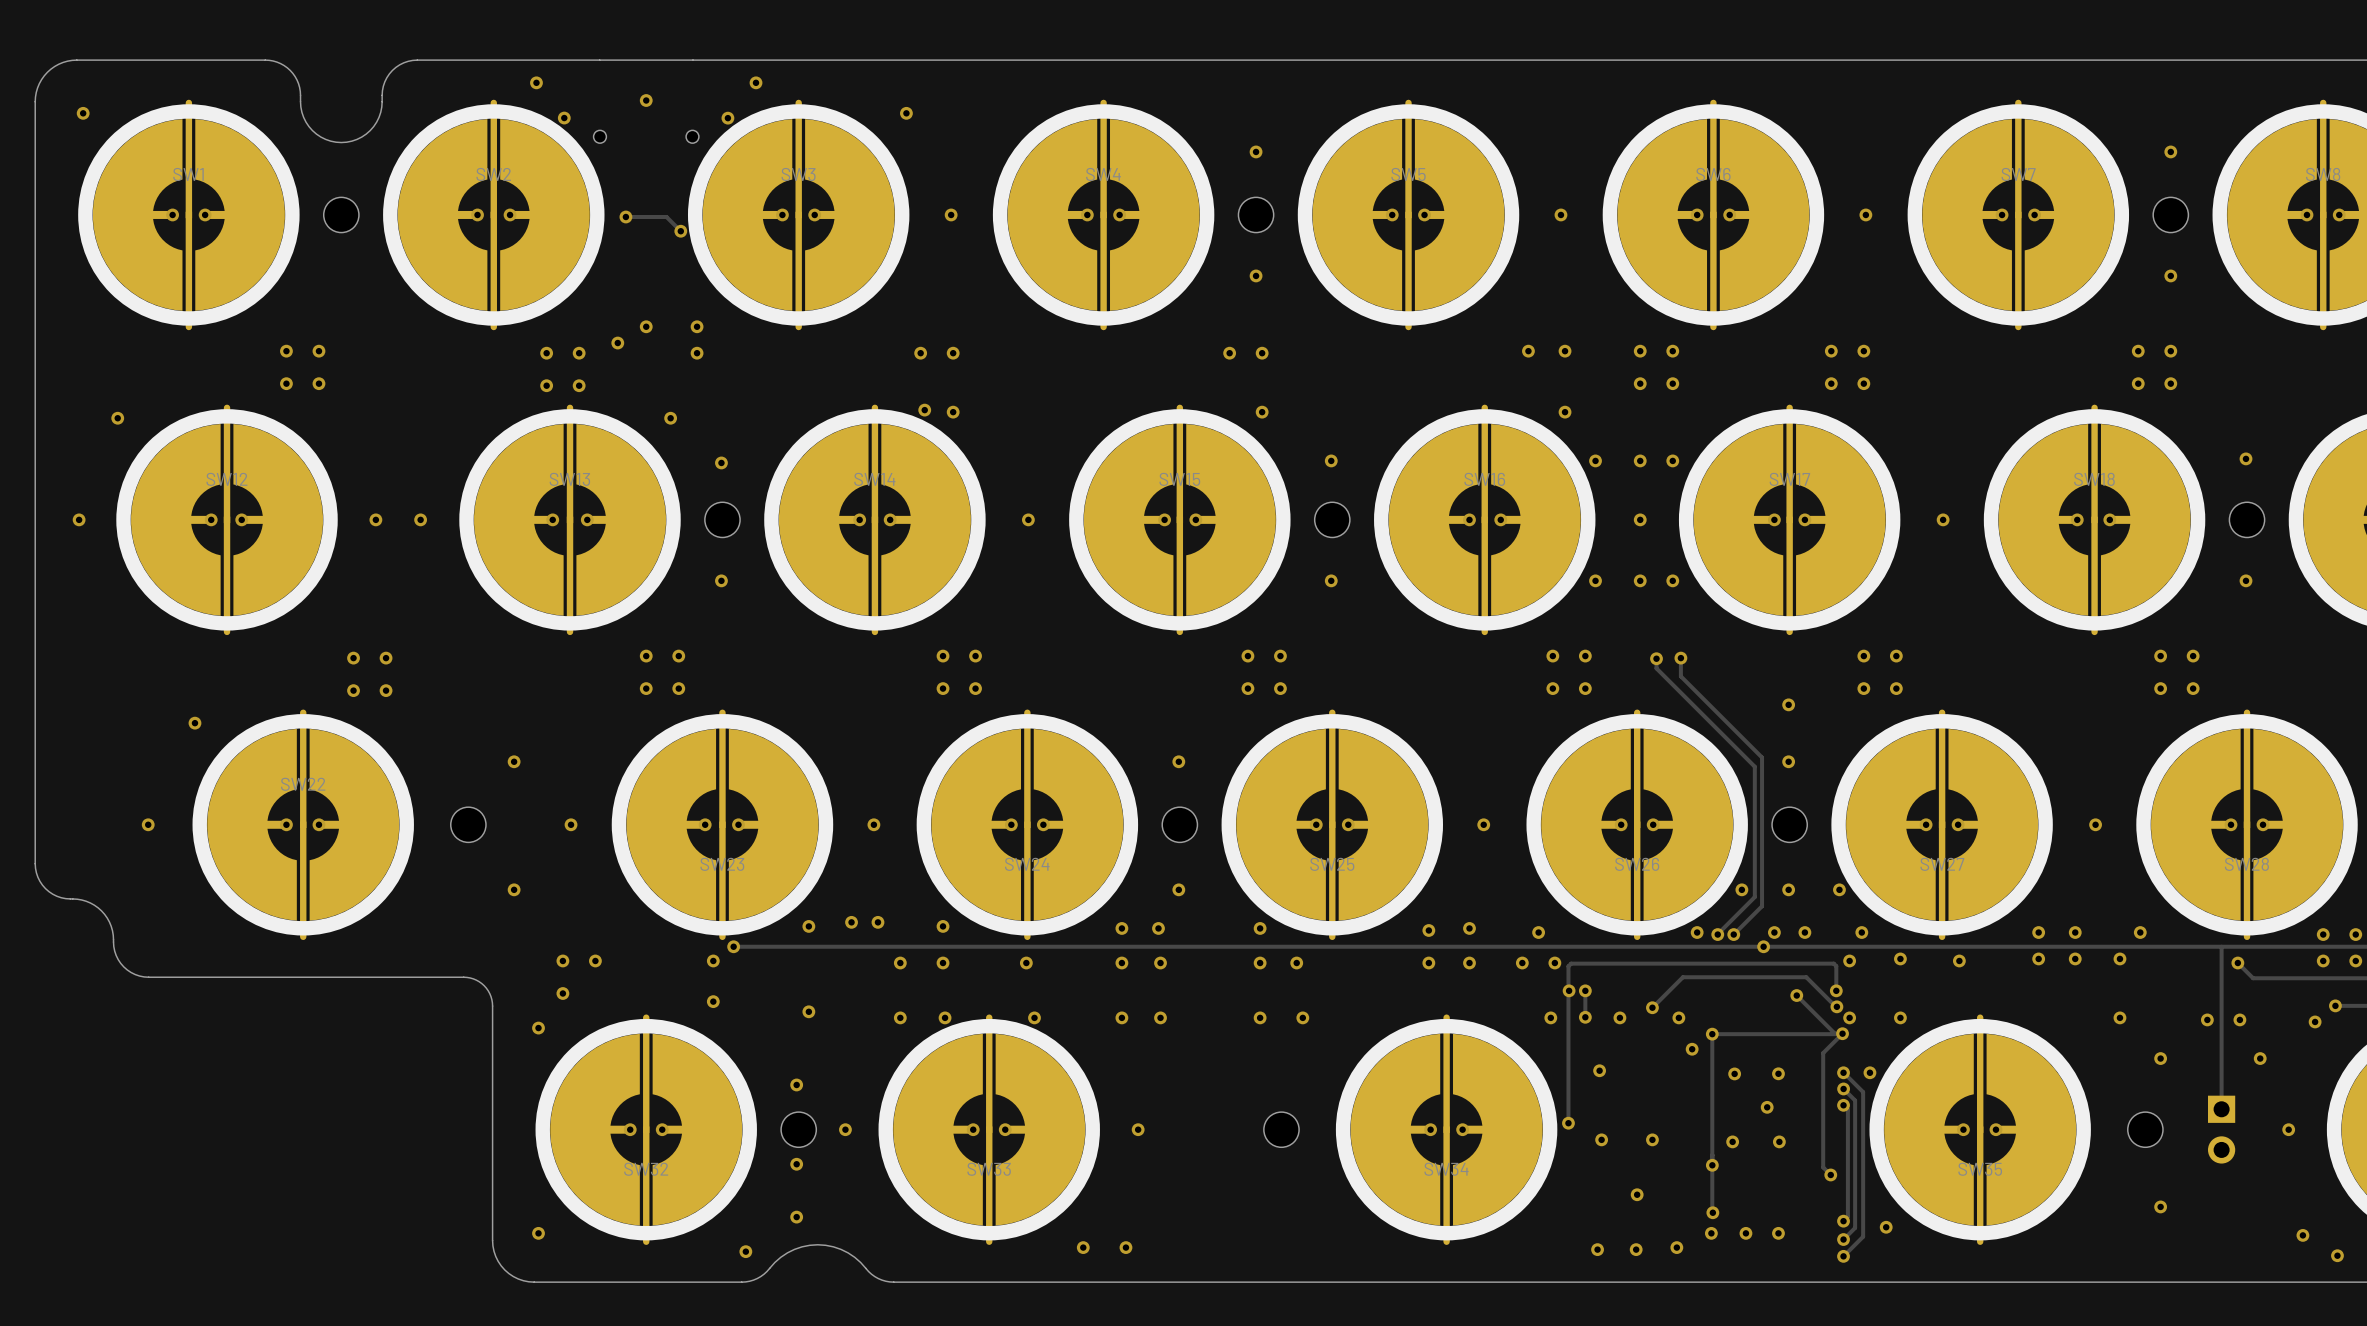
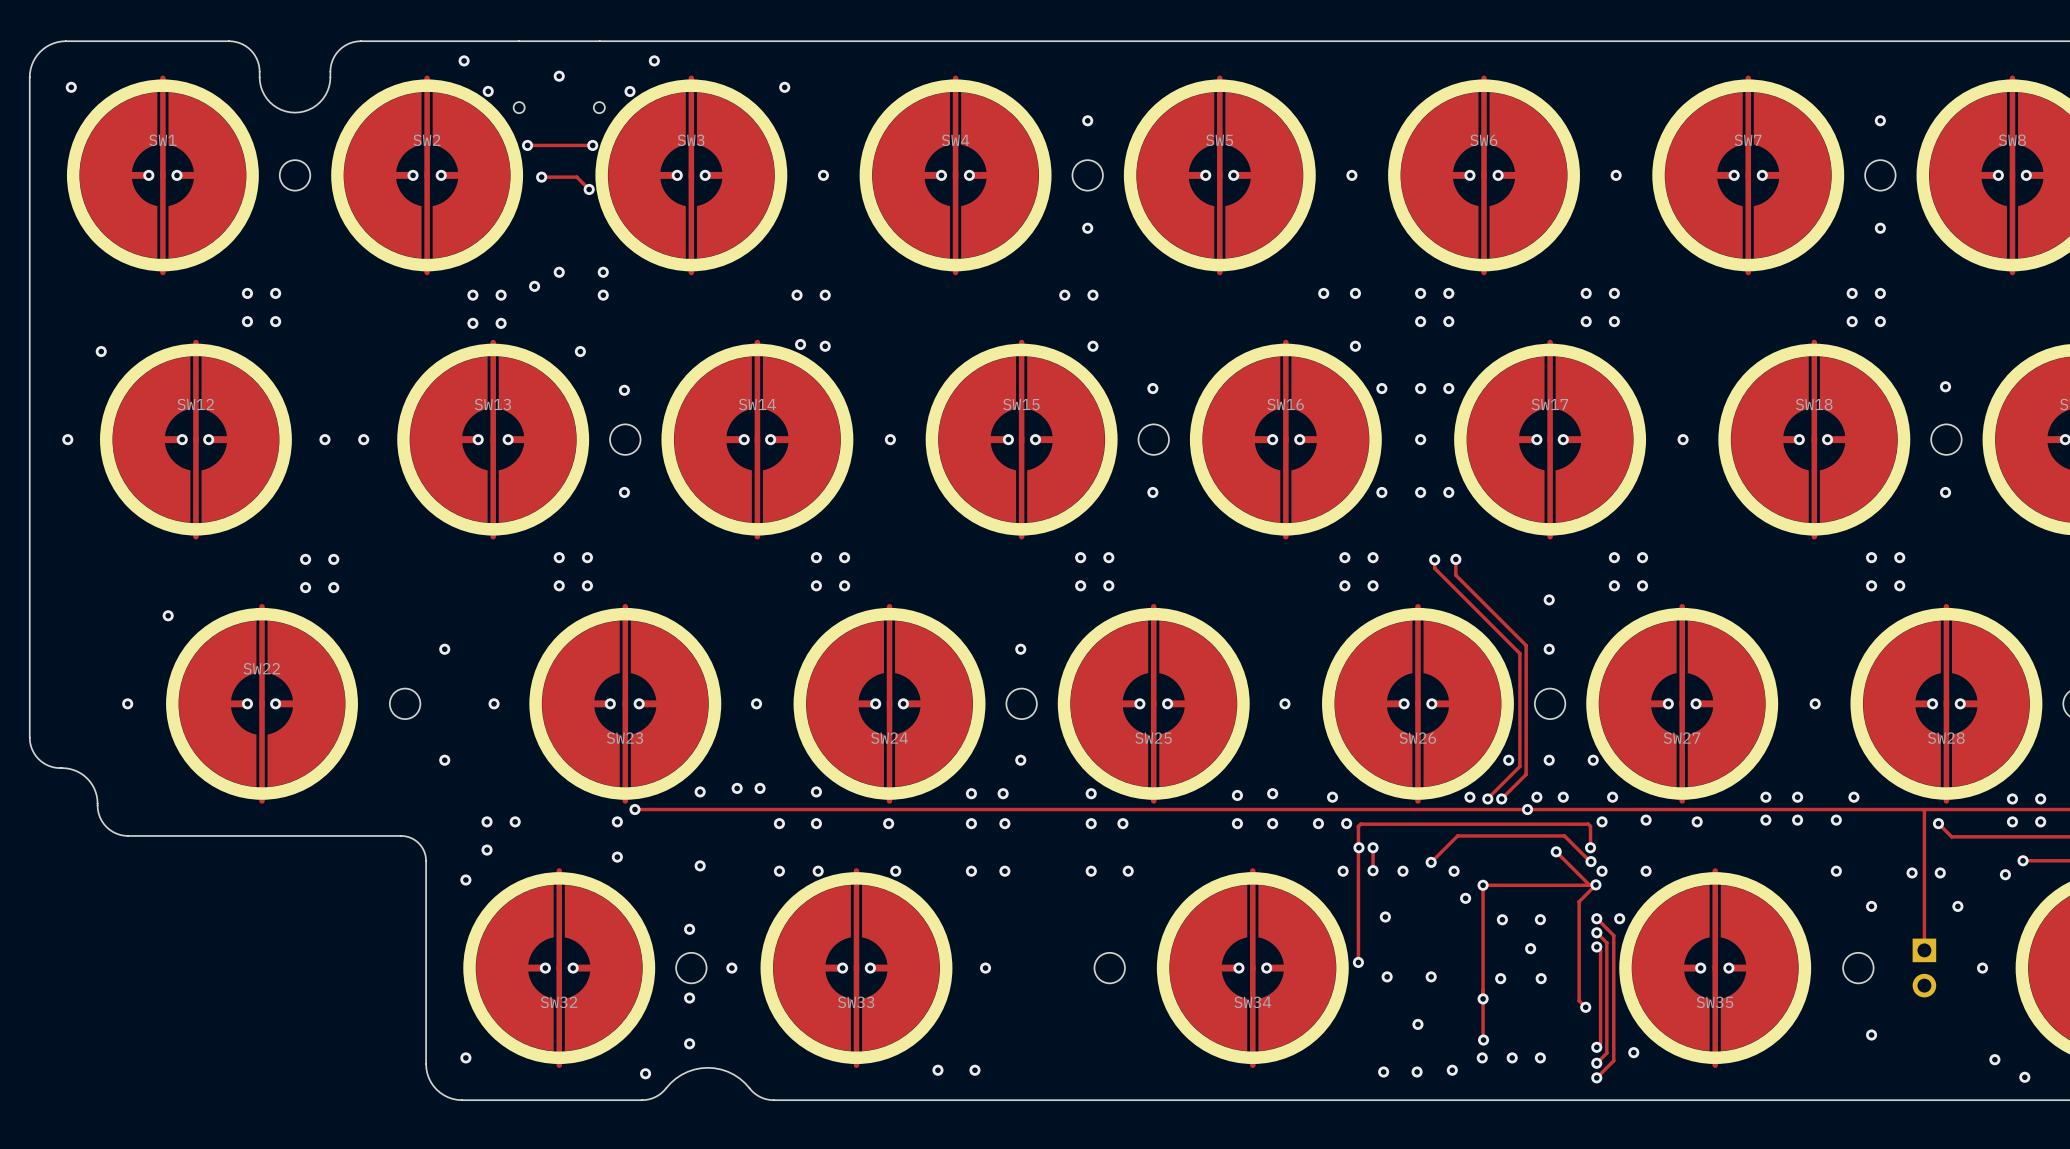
track: none -> (527, 145) (592, 145)
via: none -> (527, 145)
via: none -> (592, 145)

